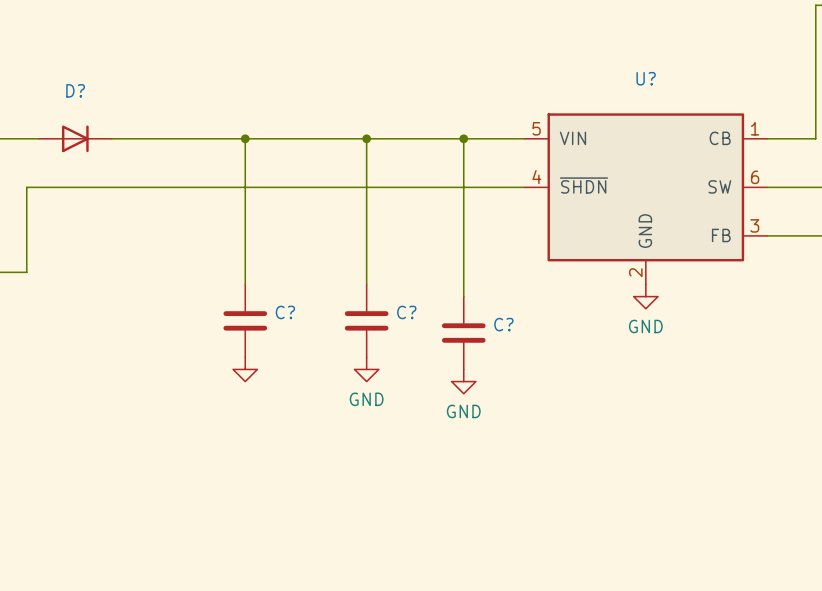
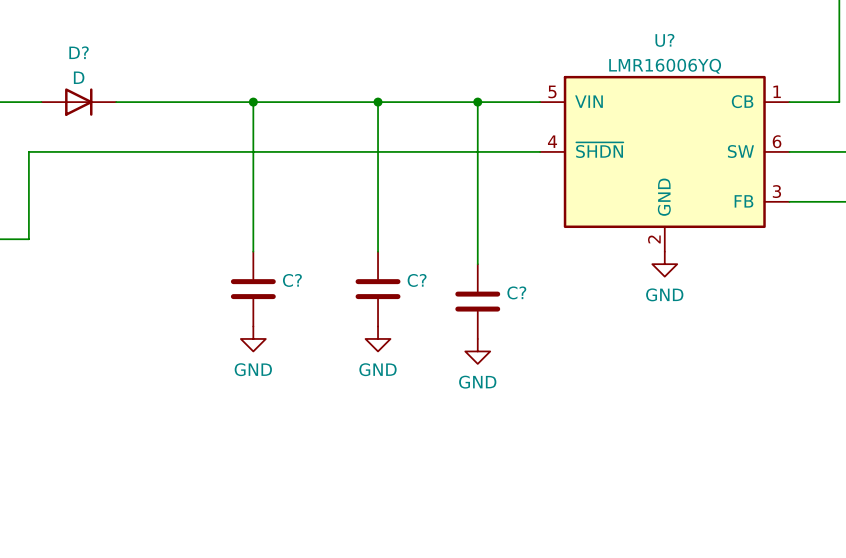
U? value: none -> LMR16006YQ (665, 66)
D? value: none -> D (79, 77)
power symbol text: none -> GND (253, 369)

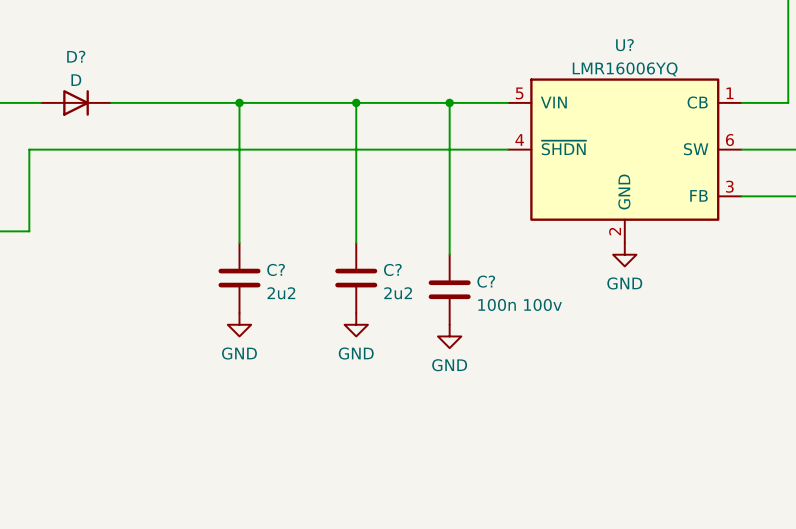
C? value: none -> 2u2 (281, 293)
C? value: none -> 2u2 (398, 293)
C? value: none -> 100n 100v (520, 304)

